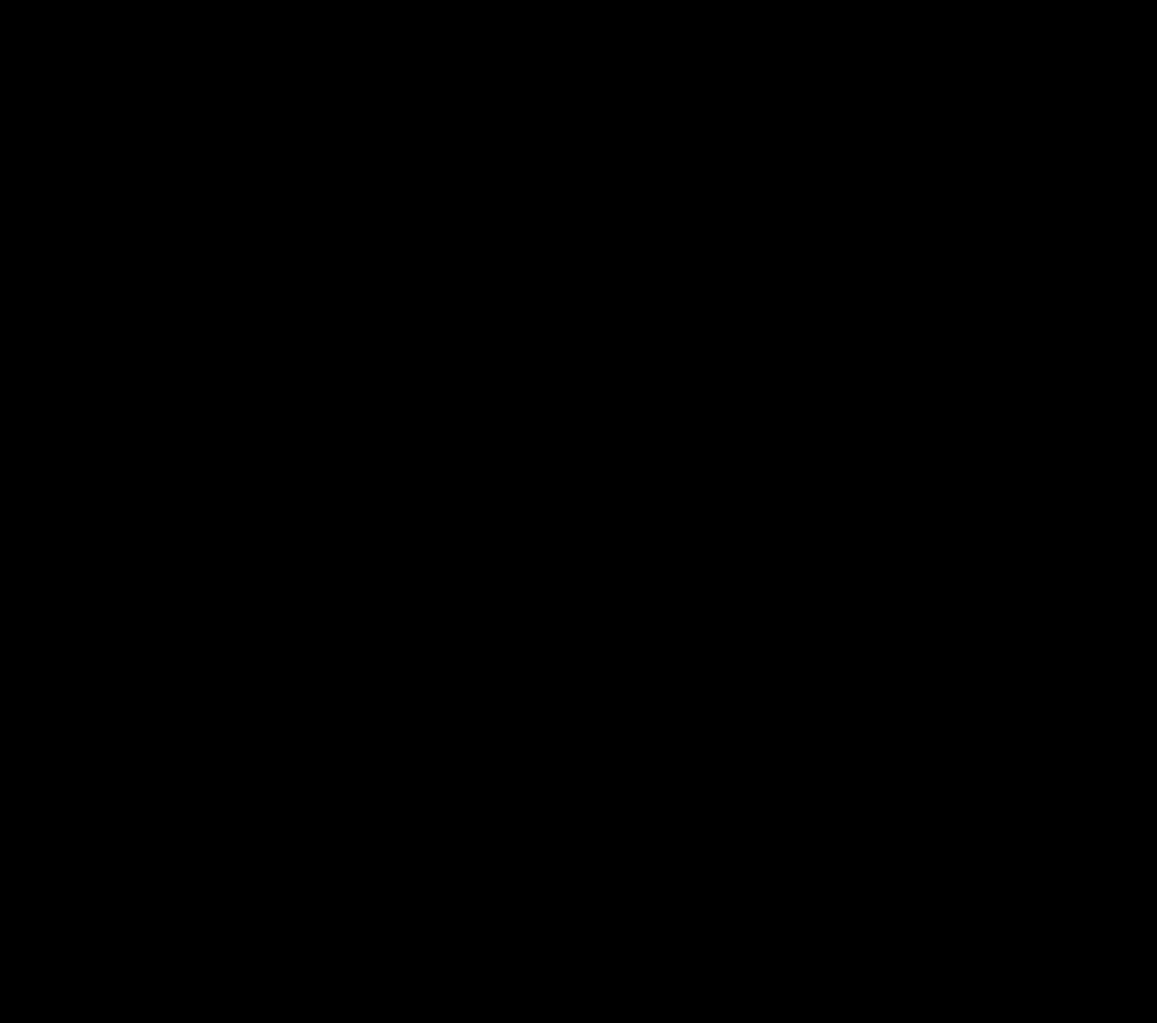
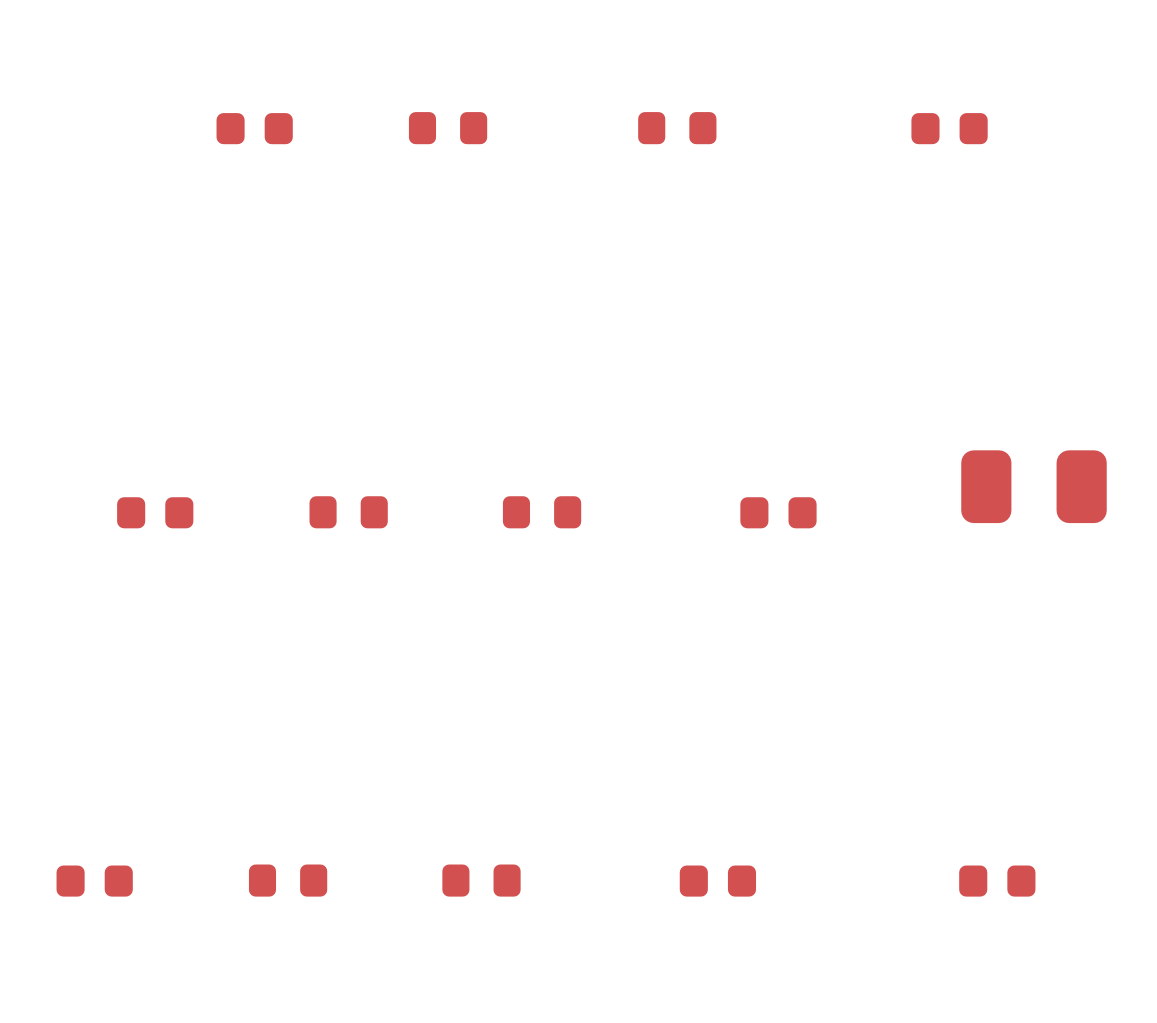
part: none -> (254, 128)
part: none -> (448, 128)
part: none -> (677, 128)
part: none -> (949, 128)
part: none -> (1033, 486)
part: none -> (155, 512)
part: none -> (348, 512)
part: none -> (542, 512)
part: none -> (778, 512)
part: none -> (288, 880)
part: none -> (481, 880)
part: none -> (94, 881)
part: none -> (717, 881)
part: none -> (997, 881)

